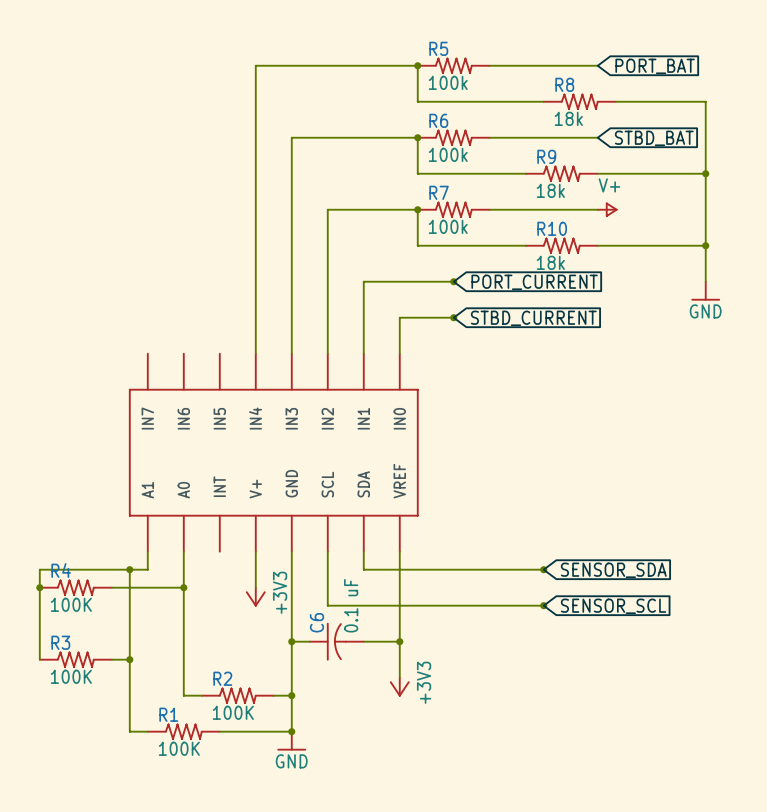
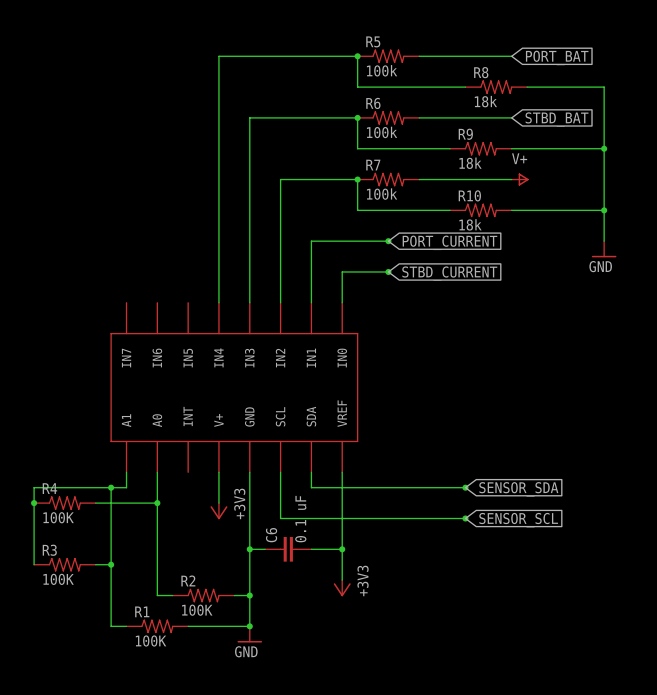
C6 symbol: [309, 622, 364, 661] -> [265, 536, 312, 562]

